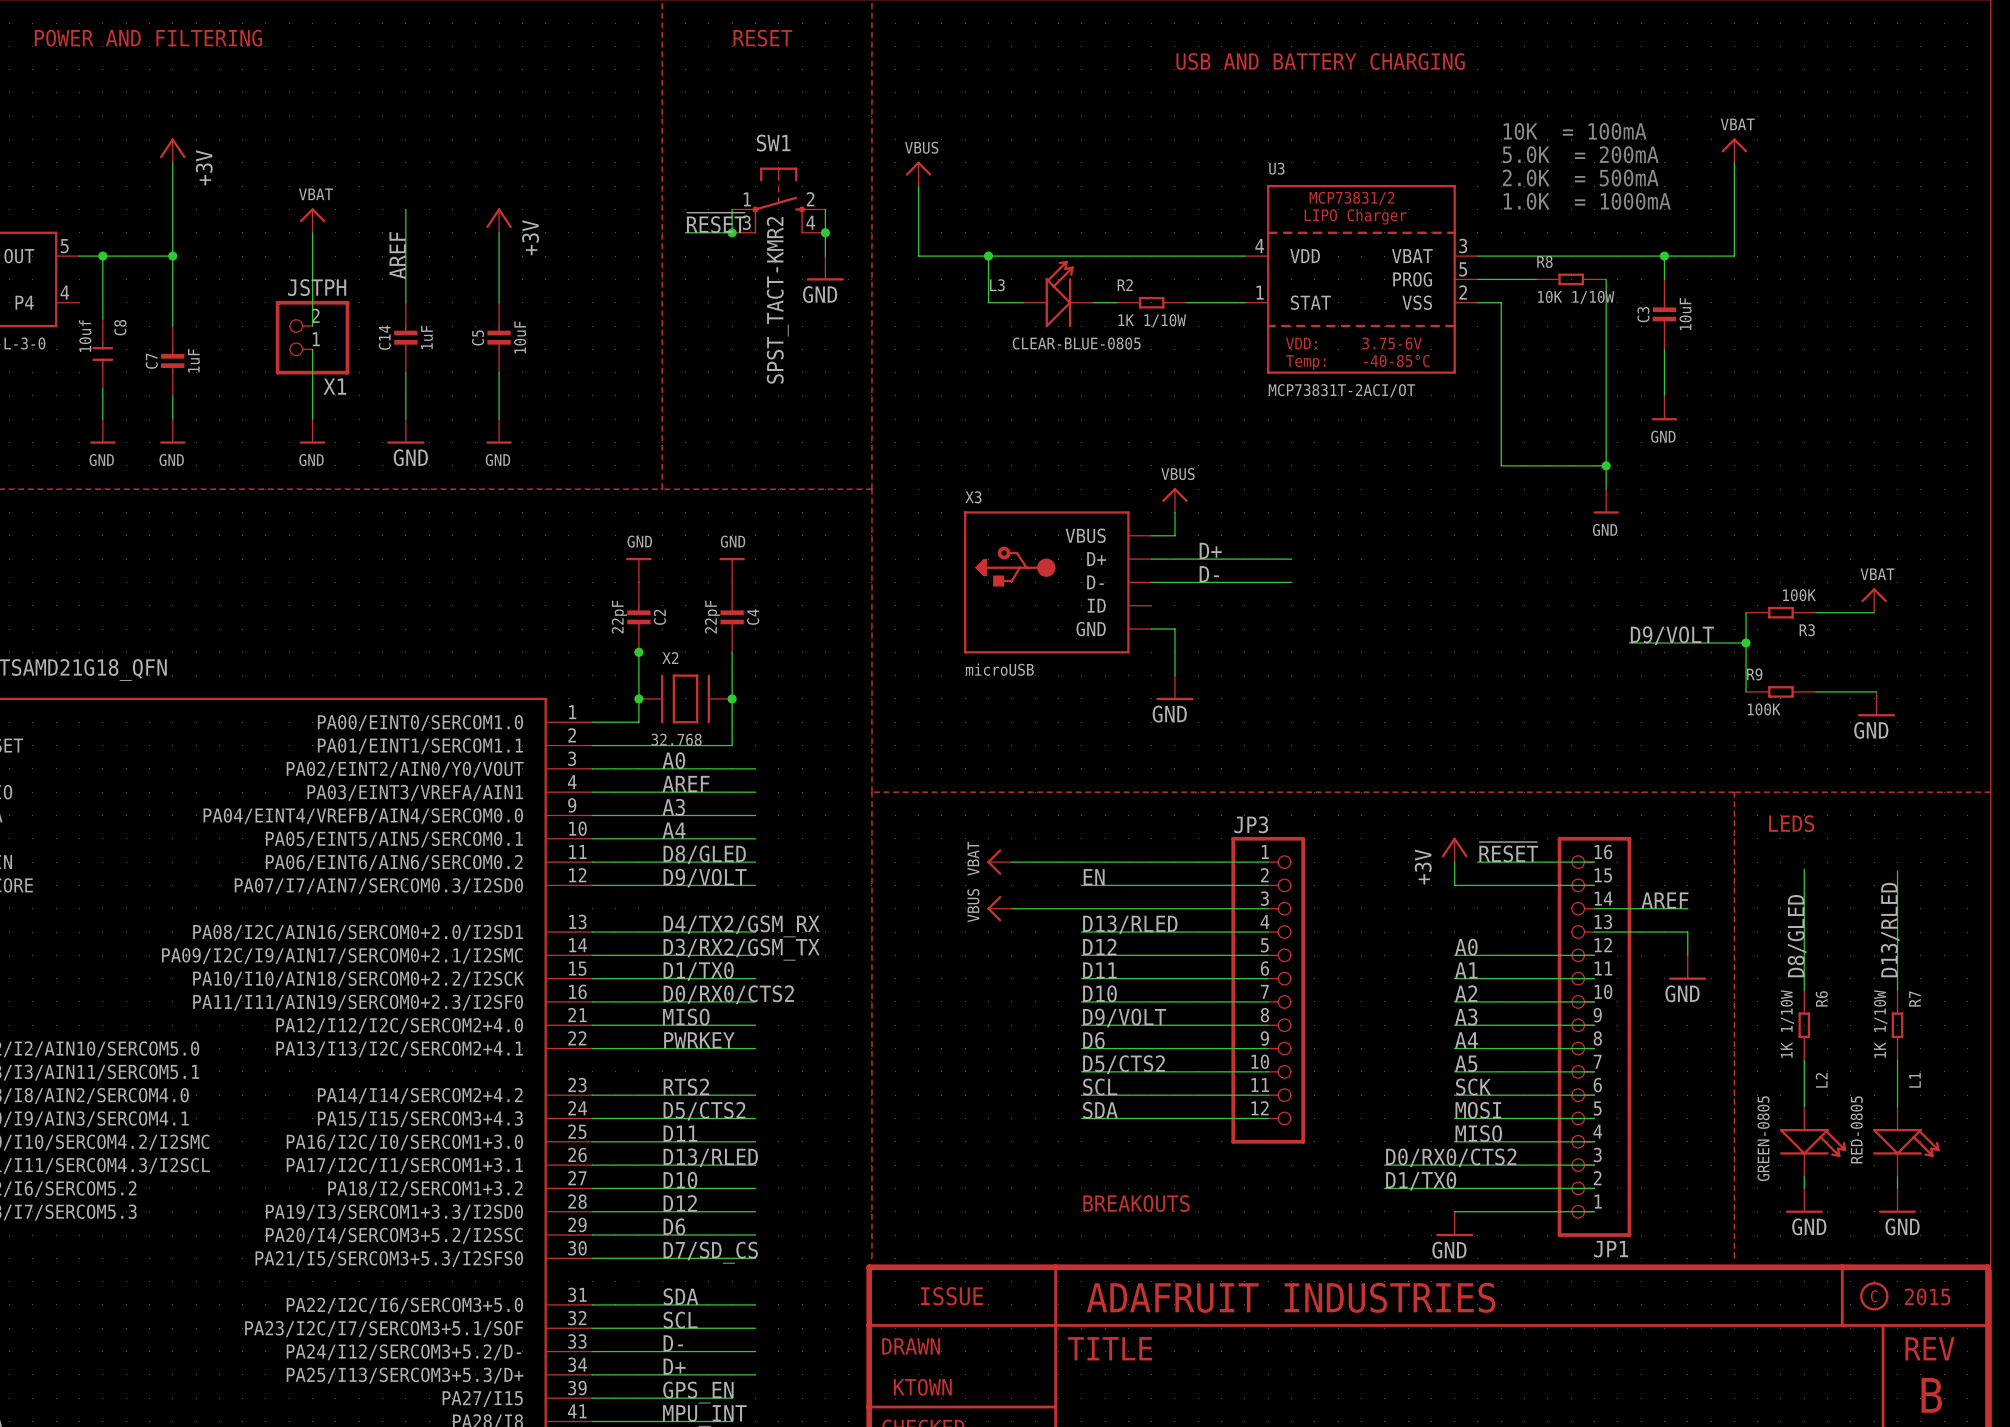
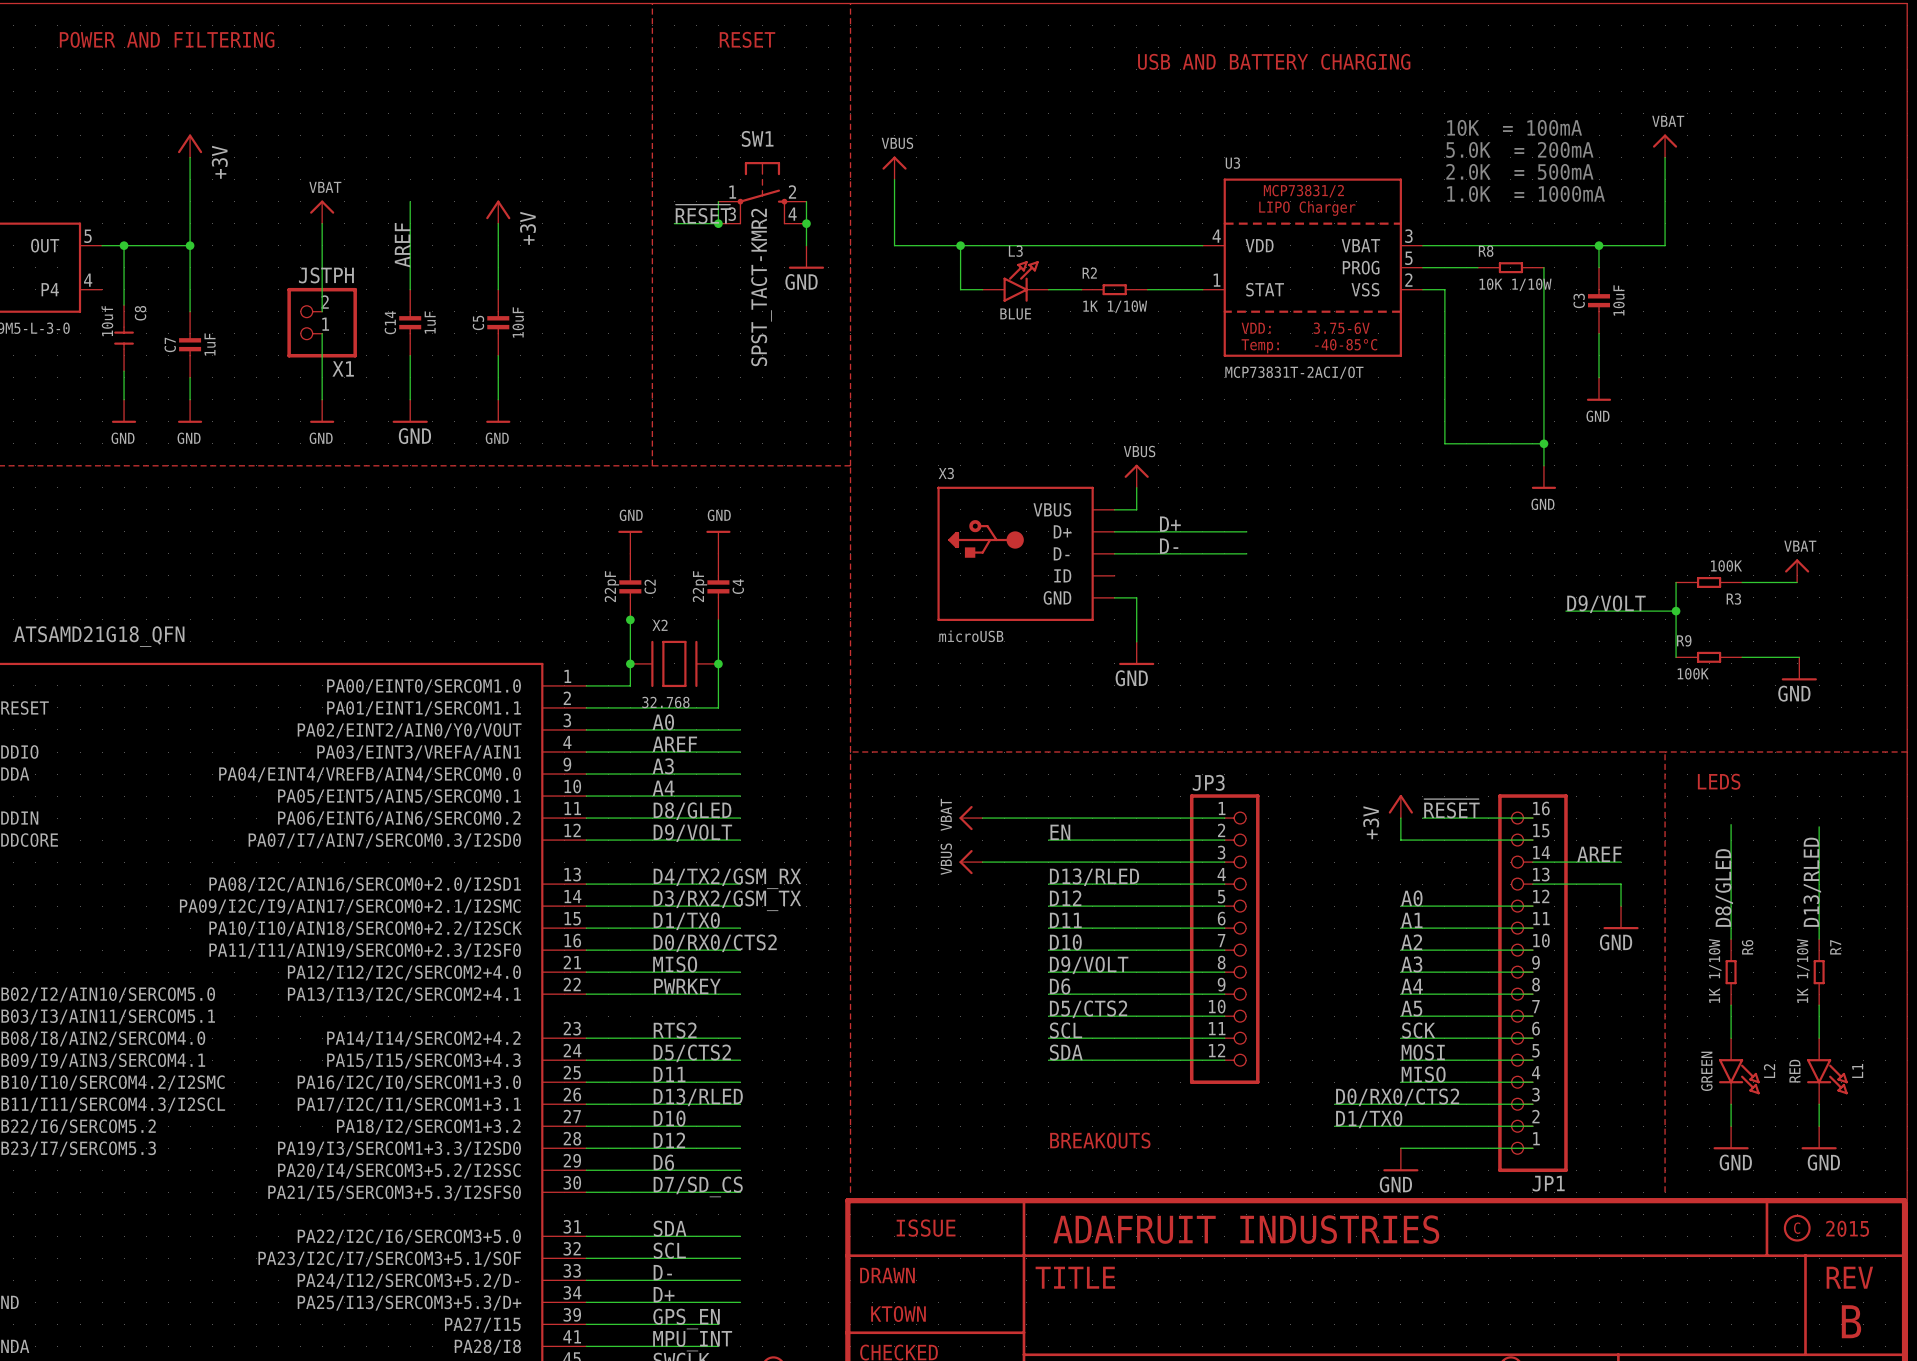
L3 symbol: [1023, 260, 1094, 328] -> [982, 261, 1049, 302]
L3 name position: L3 (997, 285) -> L3 (1015, 251)
L3 value: CLEAR-BLUE-0805 (1076, 343) -> BLUE (1015, 314)
L2 name position: L2 (1821, 1080) -> L2 (1769, 1071)
L1 name position: L1 (1915, 1080) -> L1 (1857, 1070)
L2 symbol: [1779, 1106, 1847, 1177] -> [1718, 1038, 1760, 1105]
L1 symbol: [1873, 1106, 1940, 1177] -> [1807, 1038, 1848, 1105]
L1 value: RED-0805 (1856, 1129) -> RED (1794, 1071)
L2 value: GREEN-0805 (1763, 1138) -> GREEN (1706, 1071)

